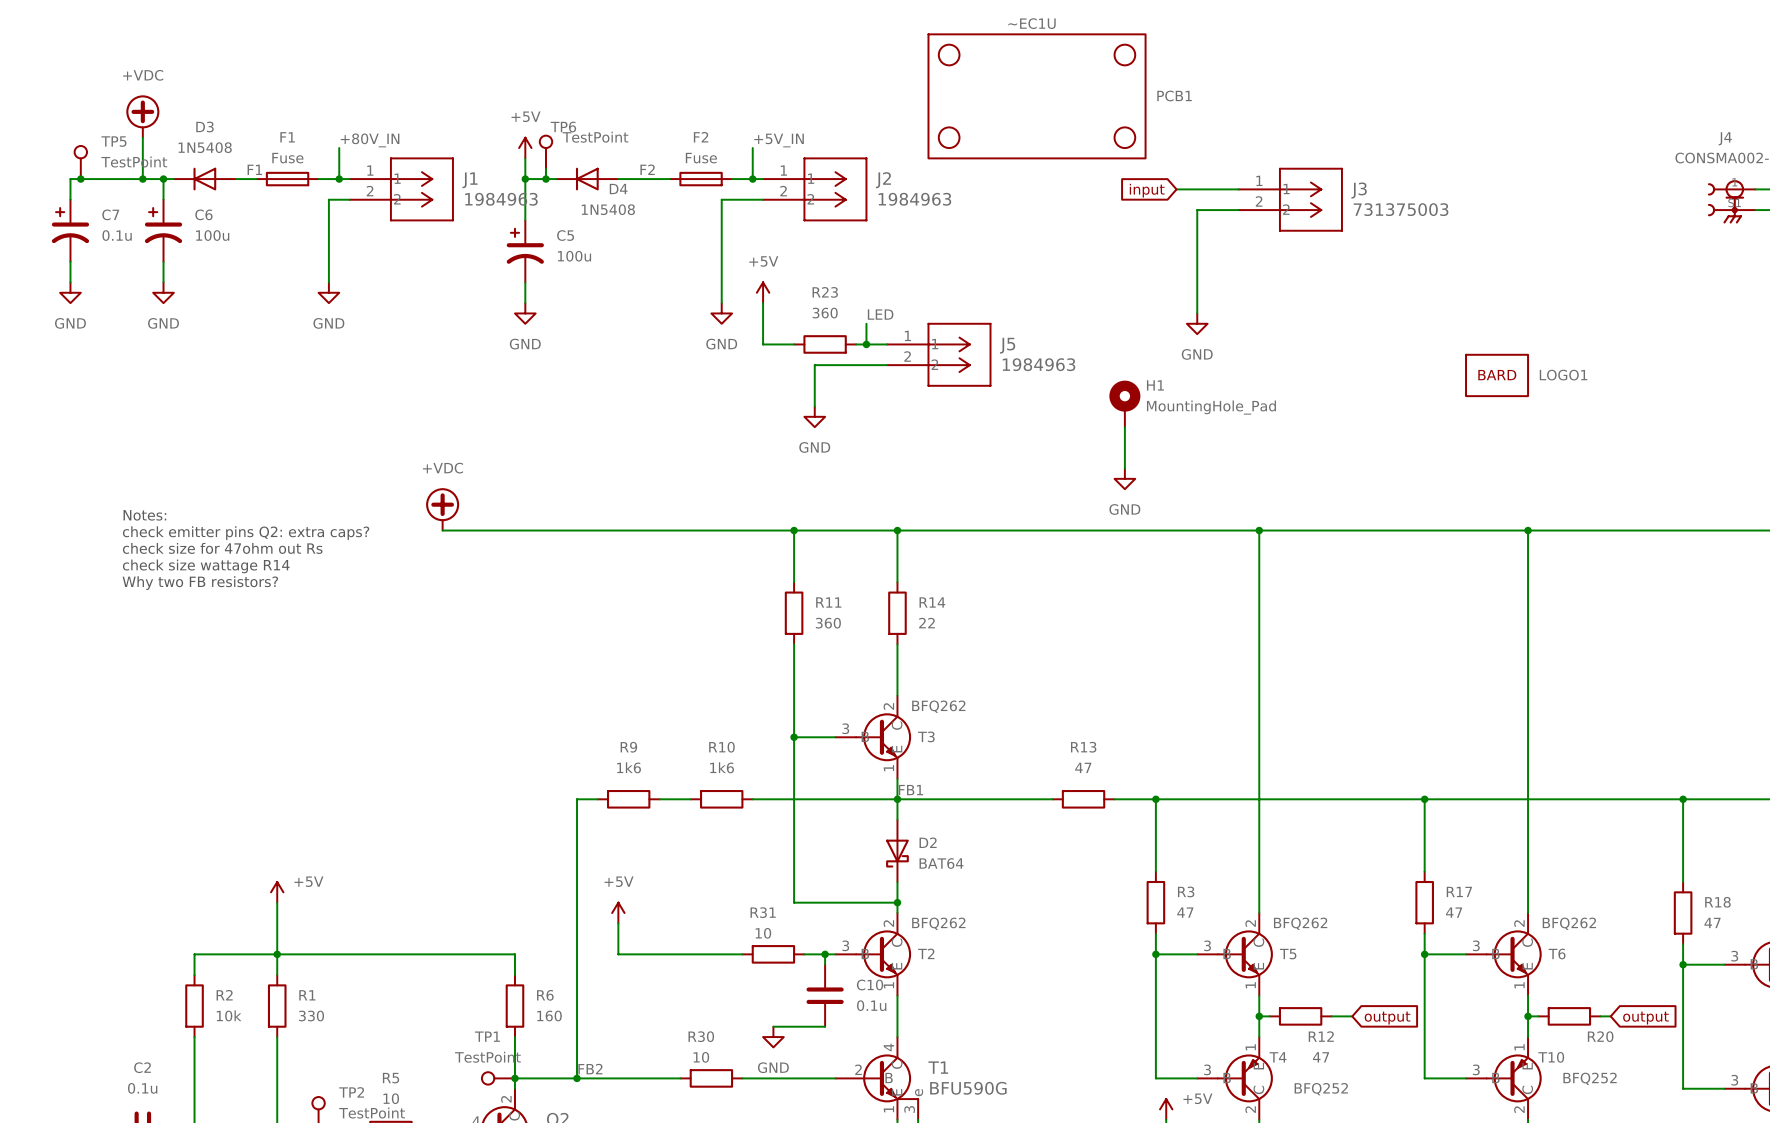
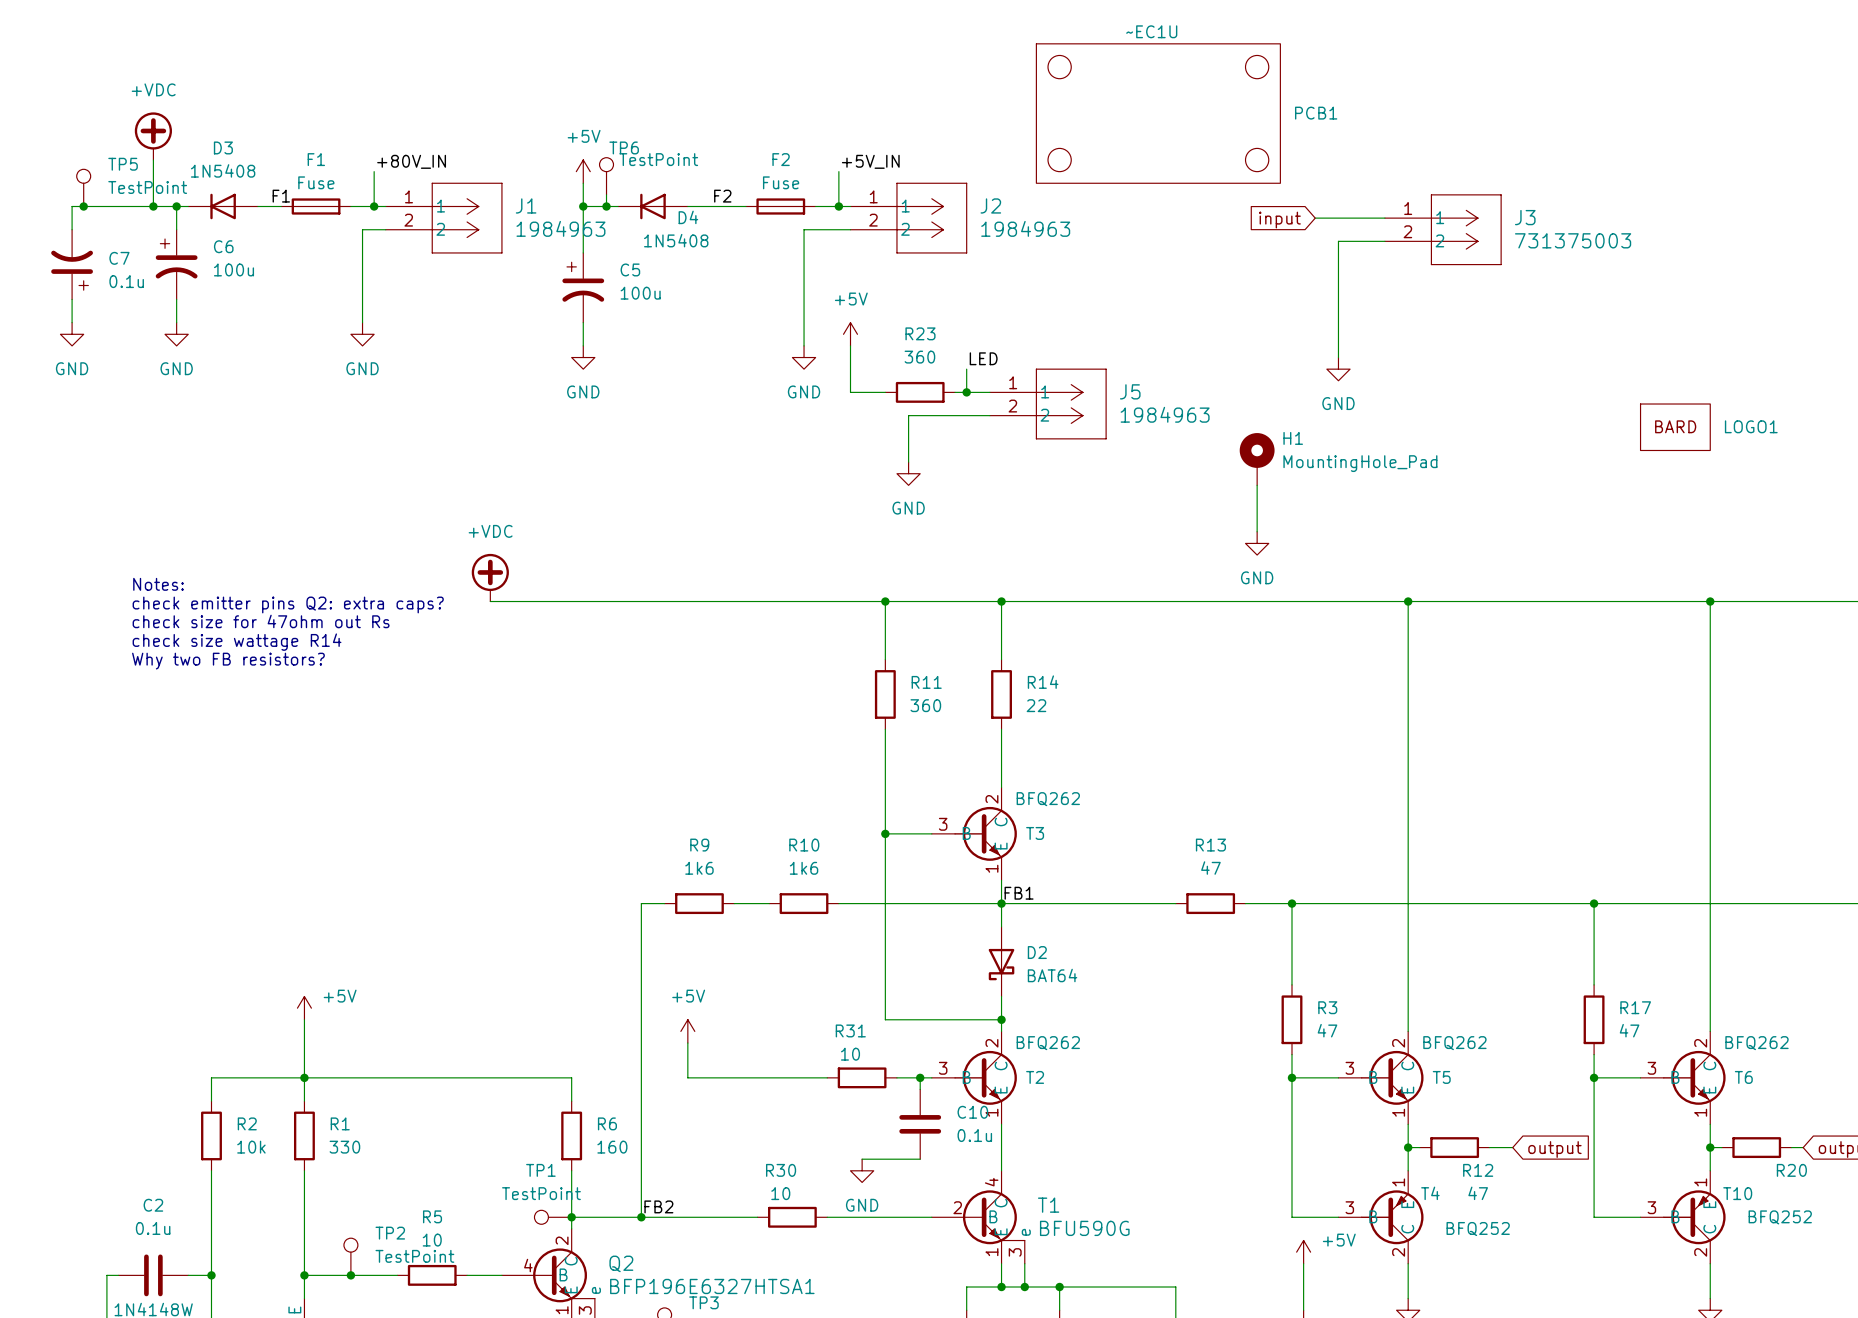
C7 rotation: 0° (70, 225) -> 180° (72, 270)

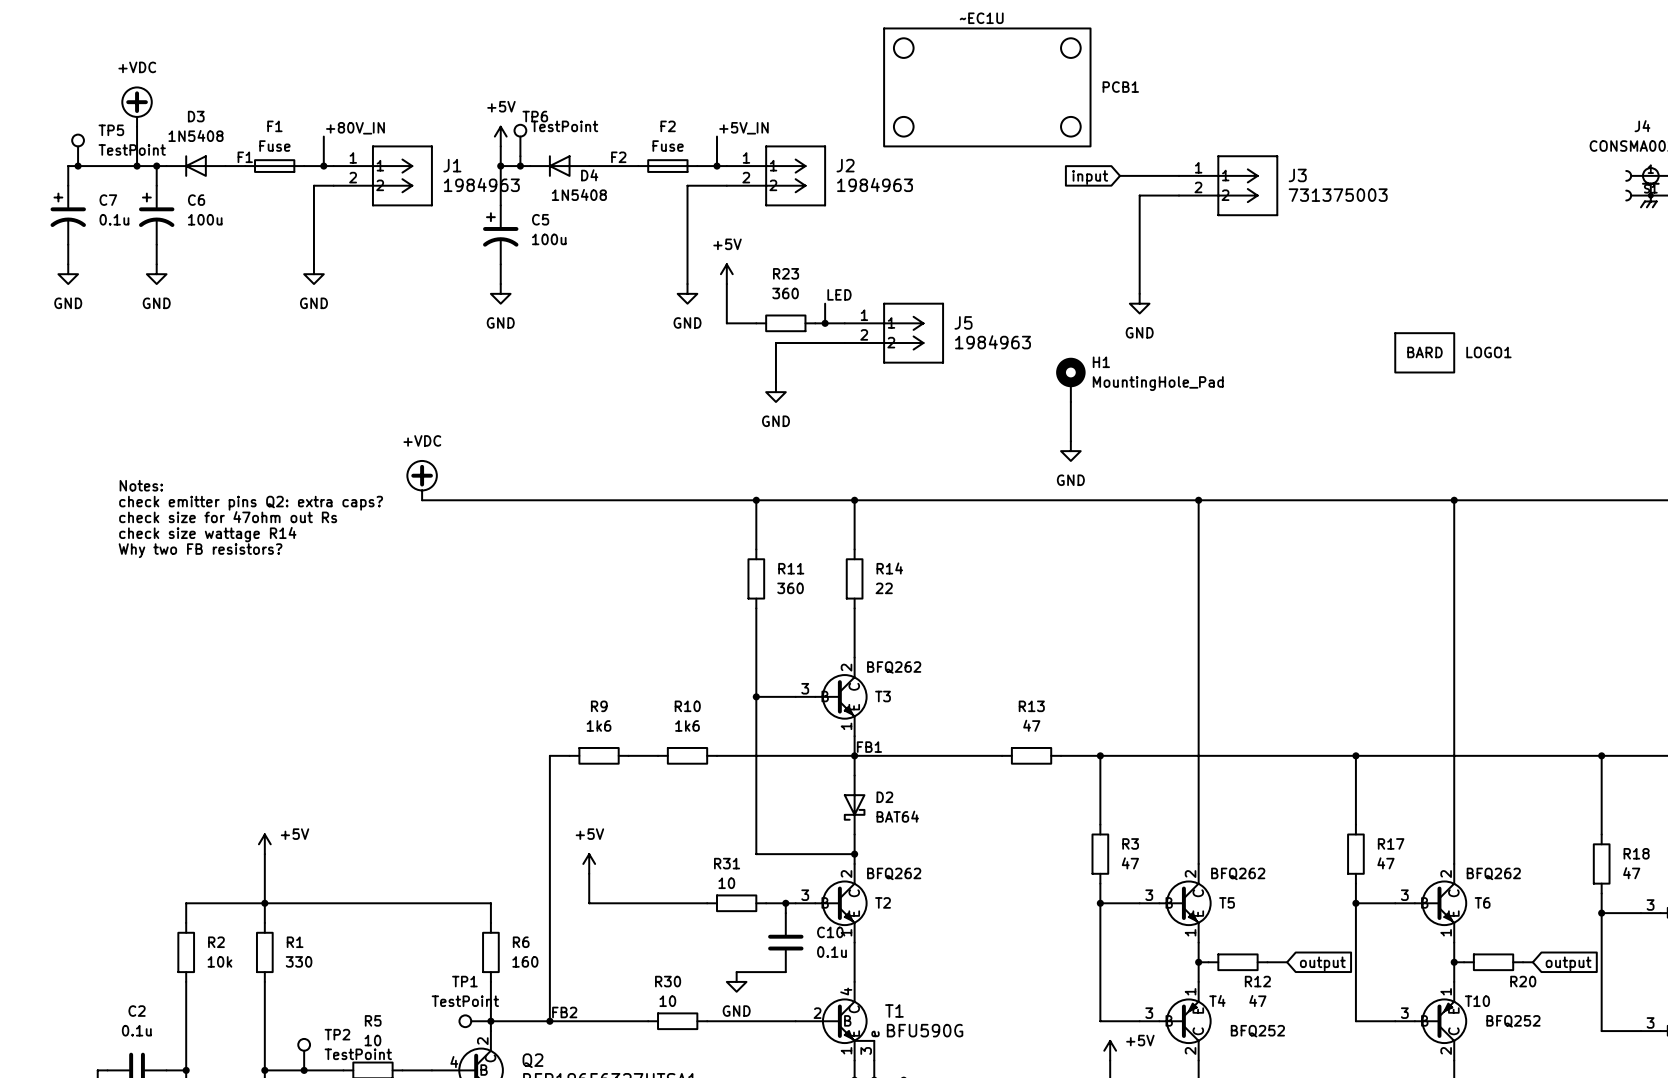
C7 rotation: 0° (72, 270) -> 180° (68, 210)

